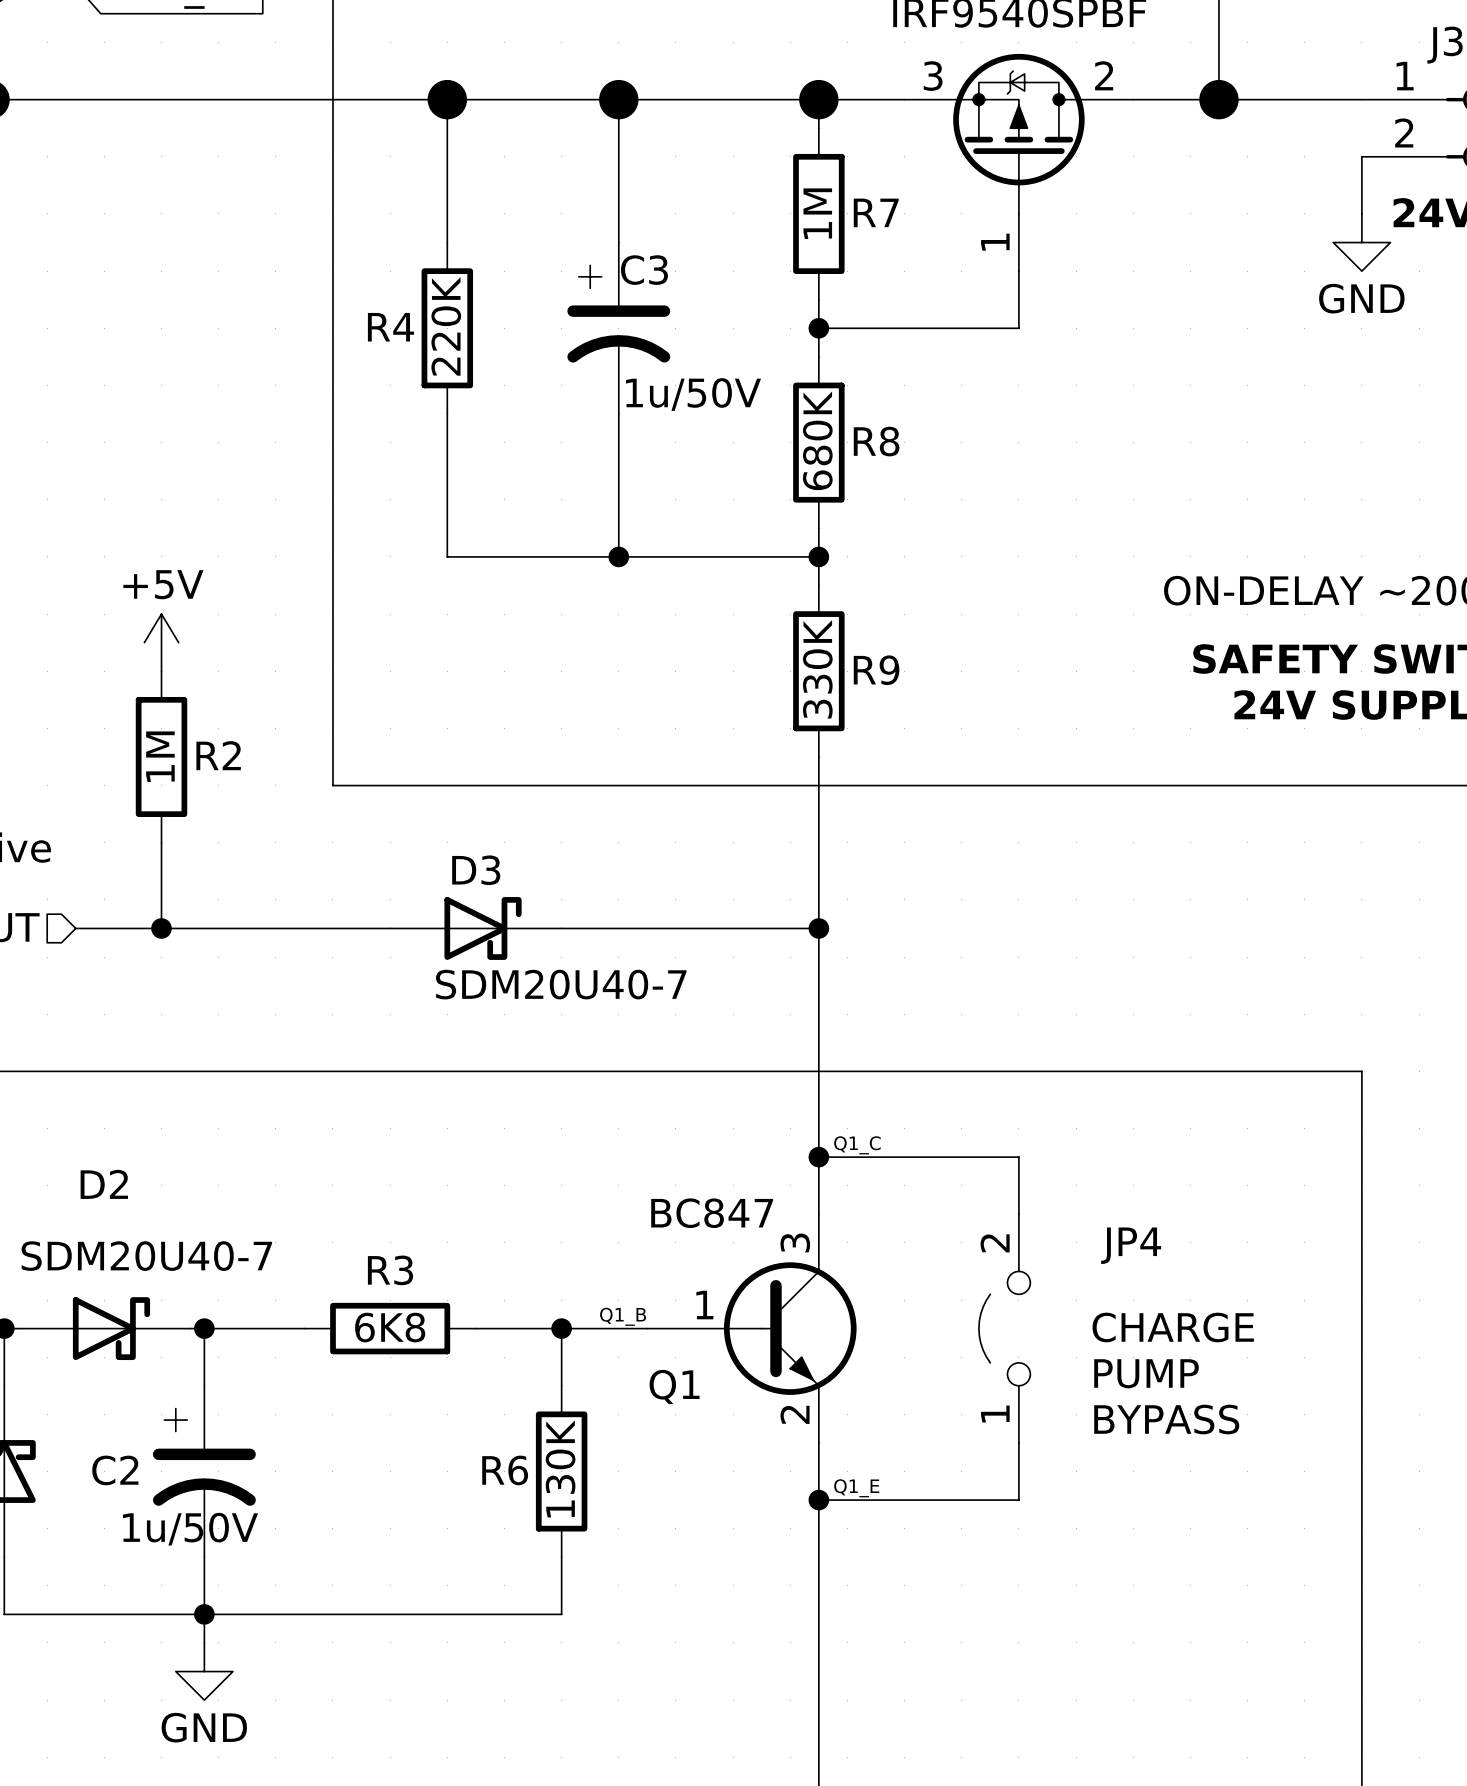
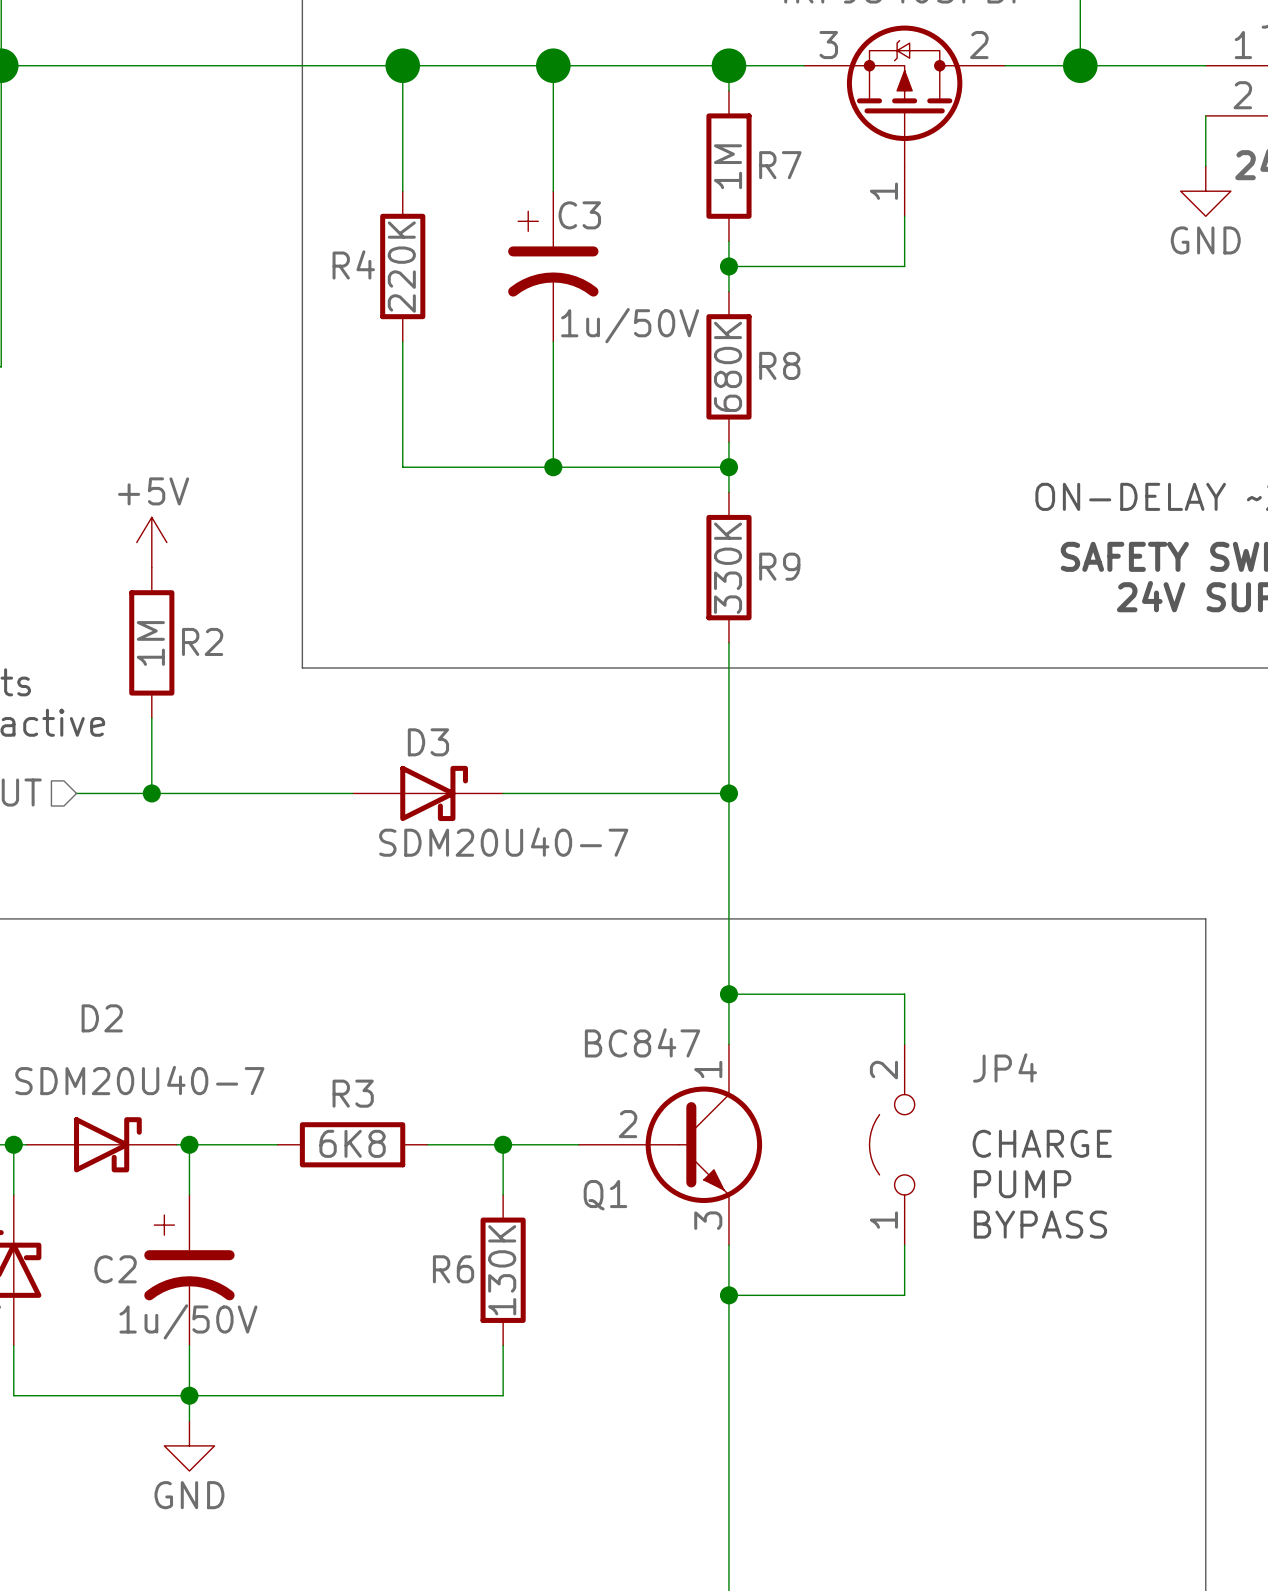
label: Q1_C (857, 1145) -> none
Q1 pin number: 3 (795, 1242) -> 1 (708, 1069)
Q1 pin number: 1 (704, 1305) -> 2 (628, 1124)
label: Q1_B (623, 1316) -> none
Q1 pin number: 2 (795, 1414) -> 3 (708, 1220)
label: Q1_E (856, 1488) -> none

